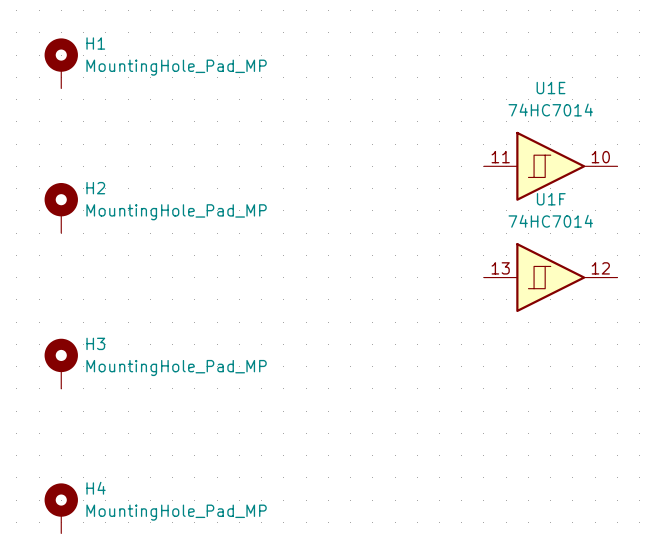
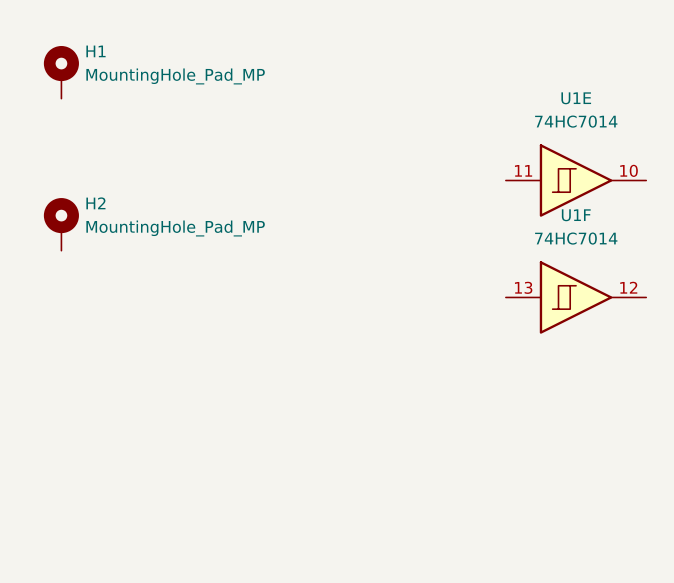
H3: MountingHole_Pad_MP (61, 363) -> none
H4: MountingHole_Pad_MP (61, 508) -> none

